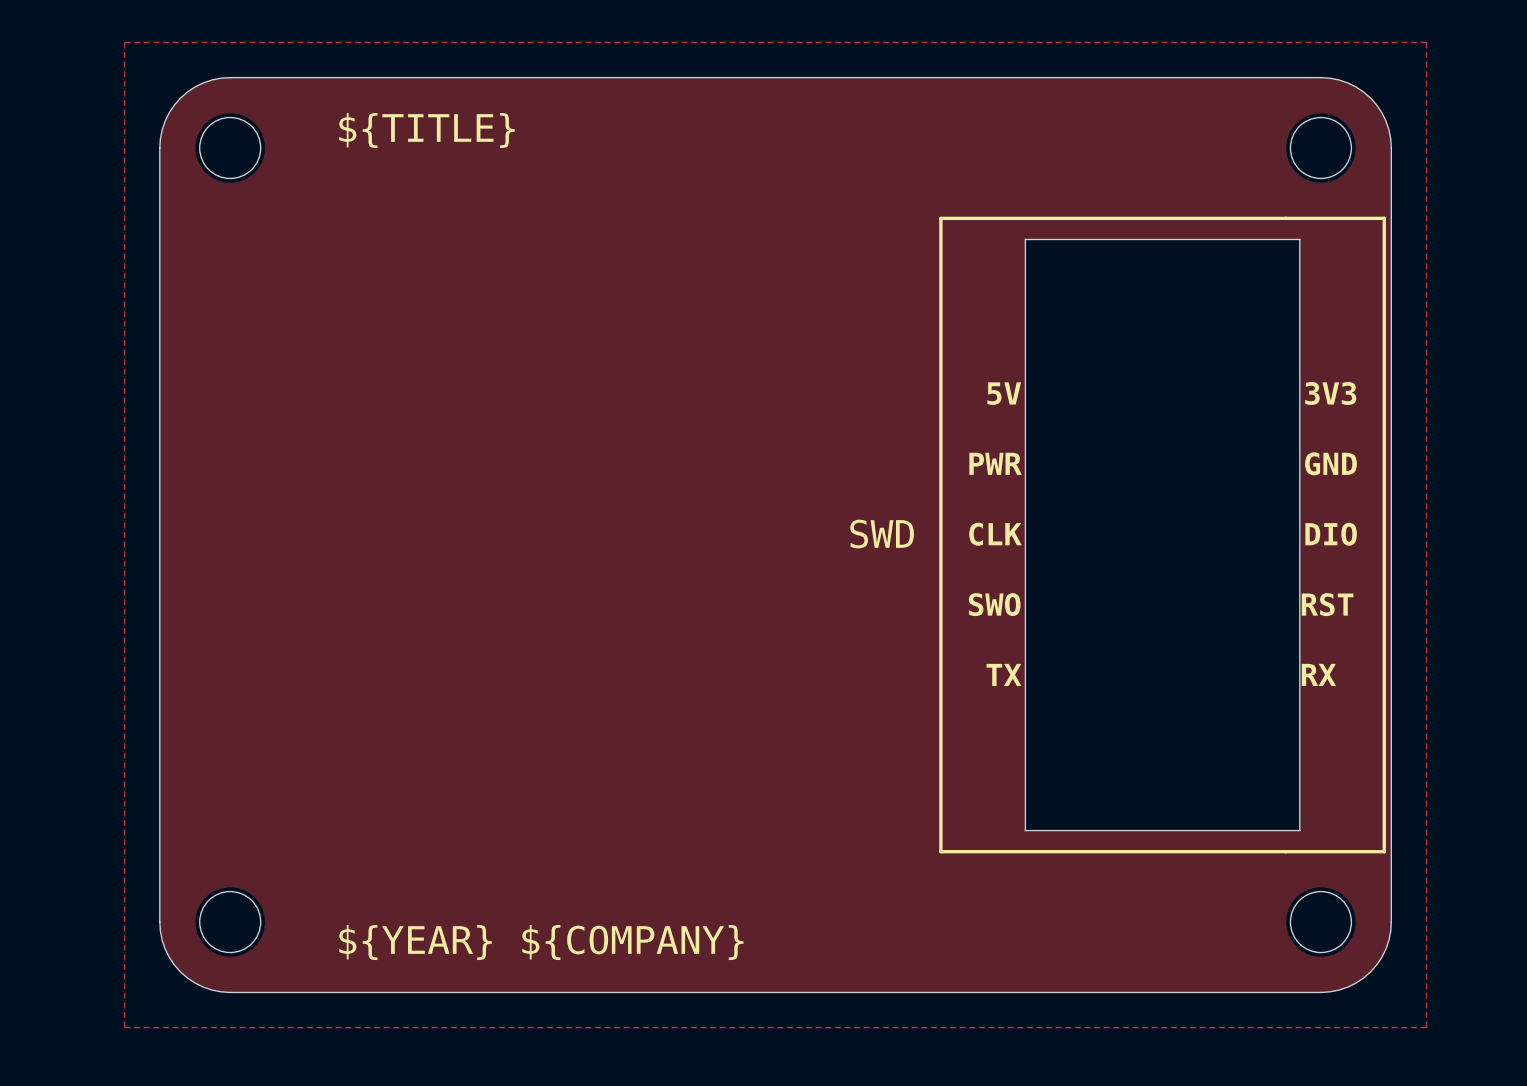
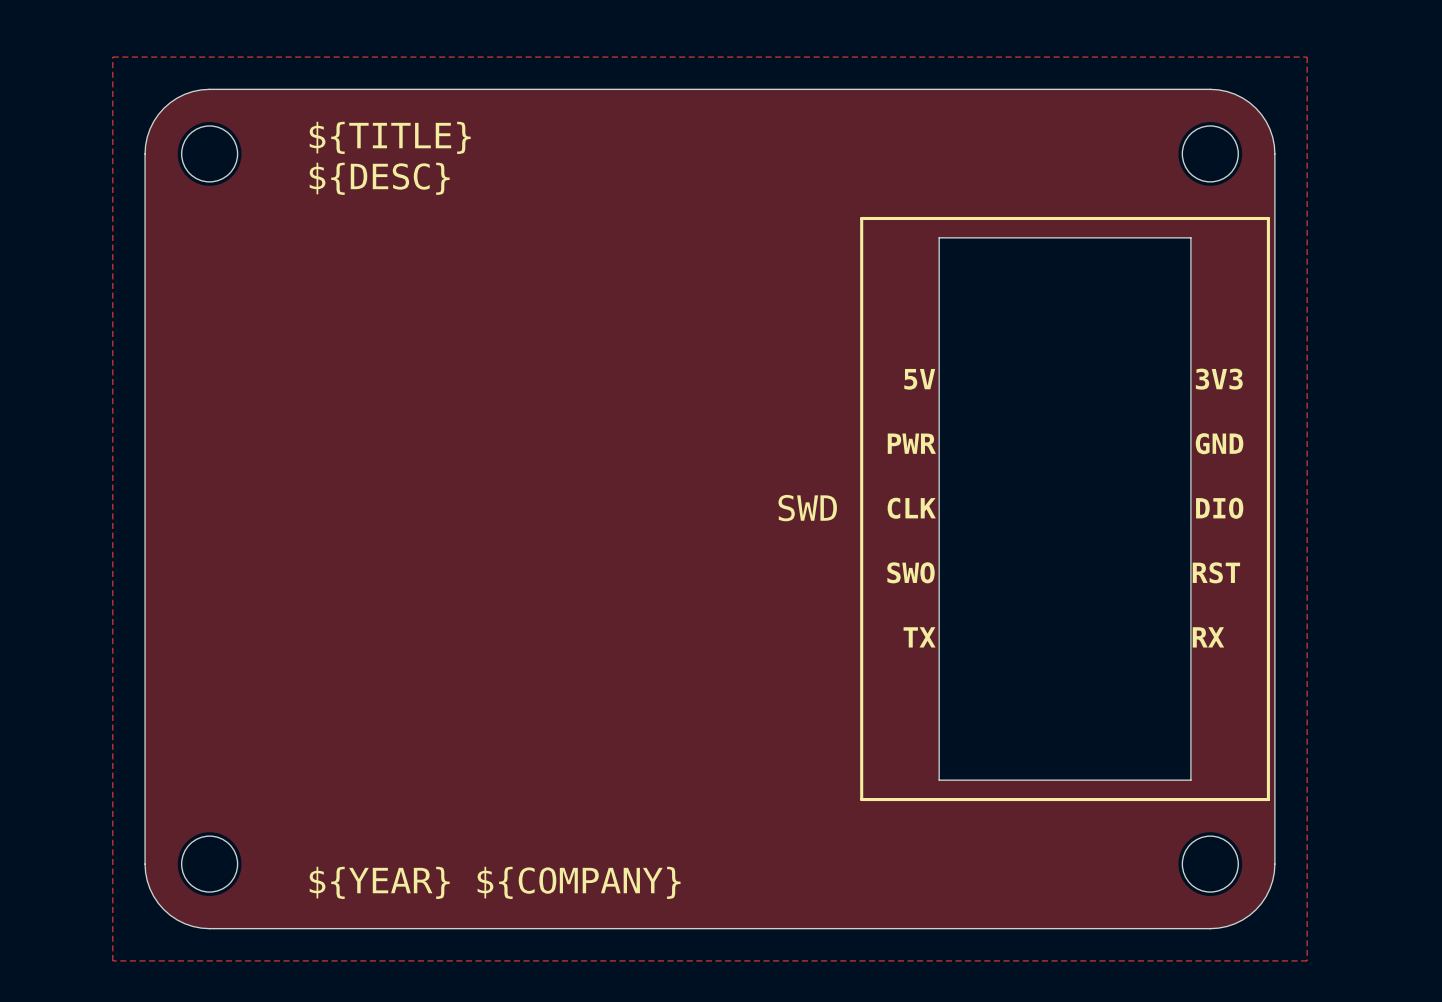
text: none -> ${DESC} (379, 178)

